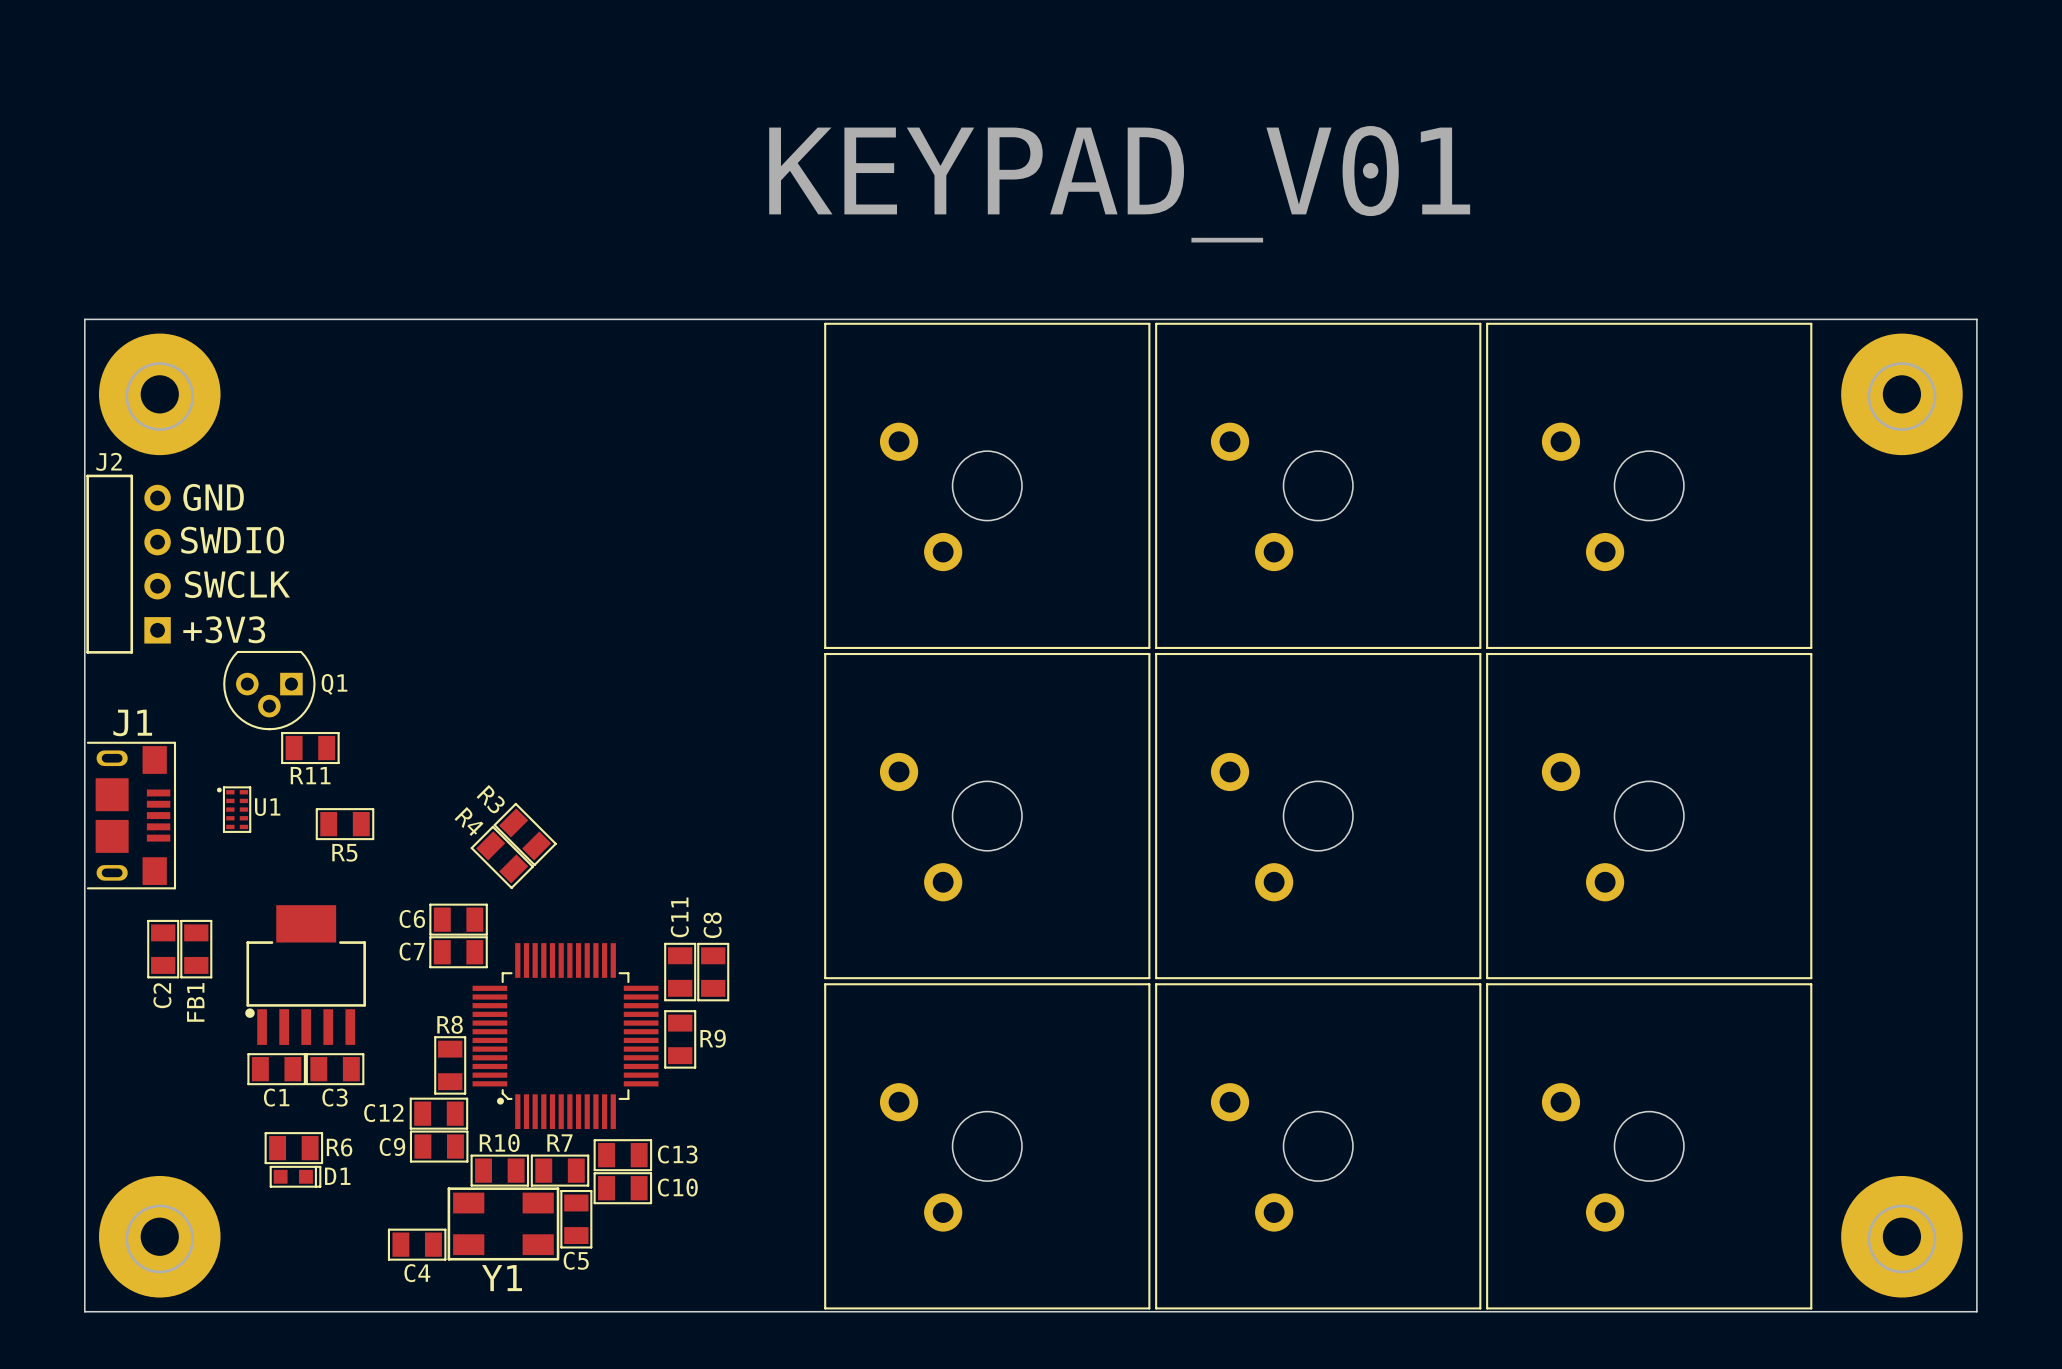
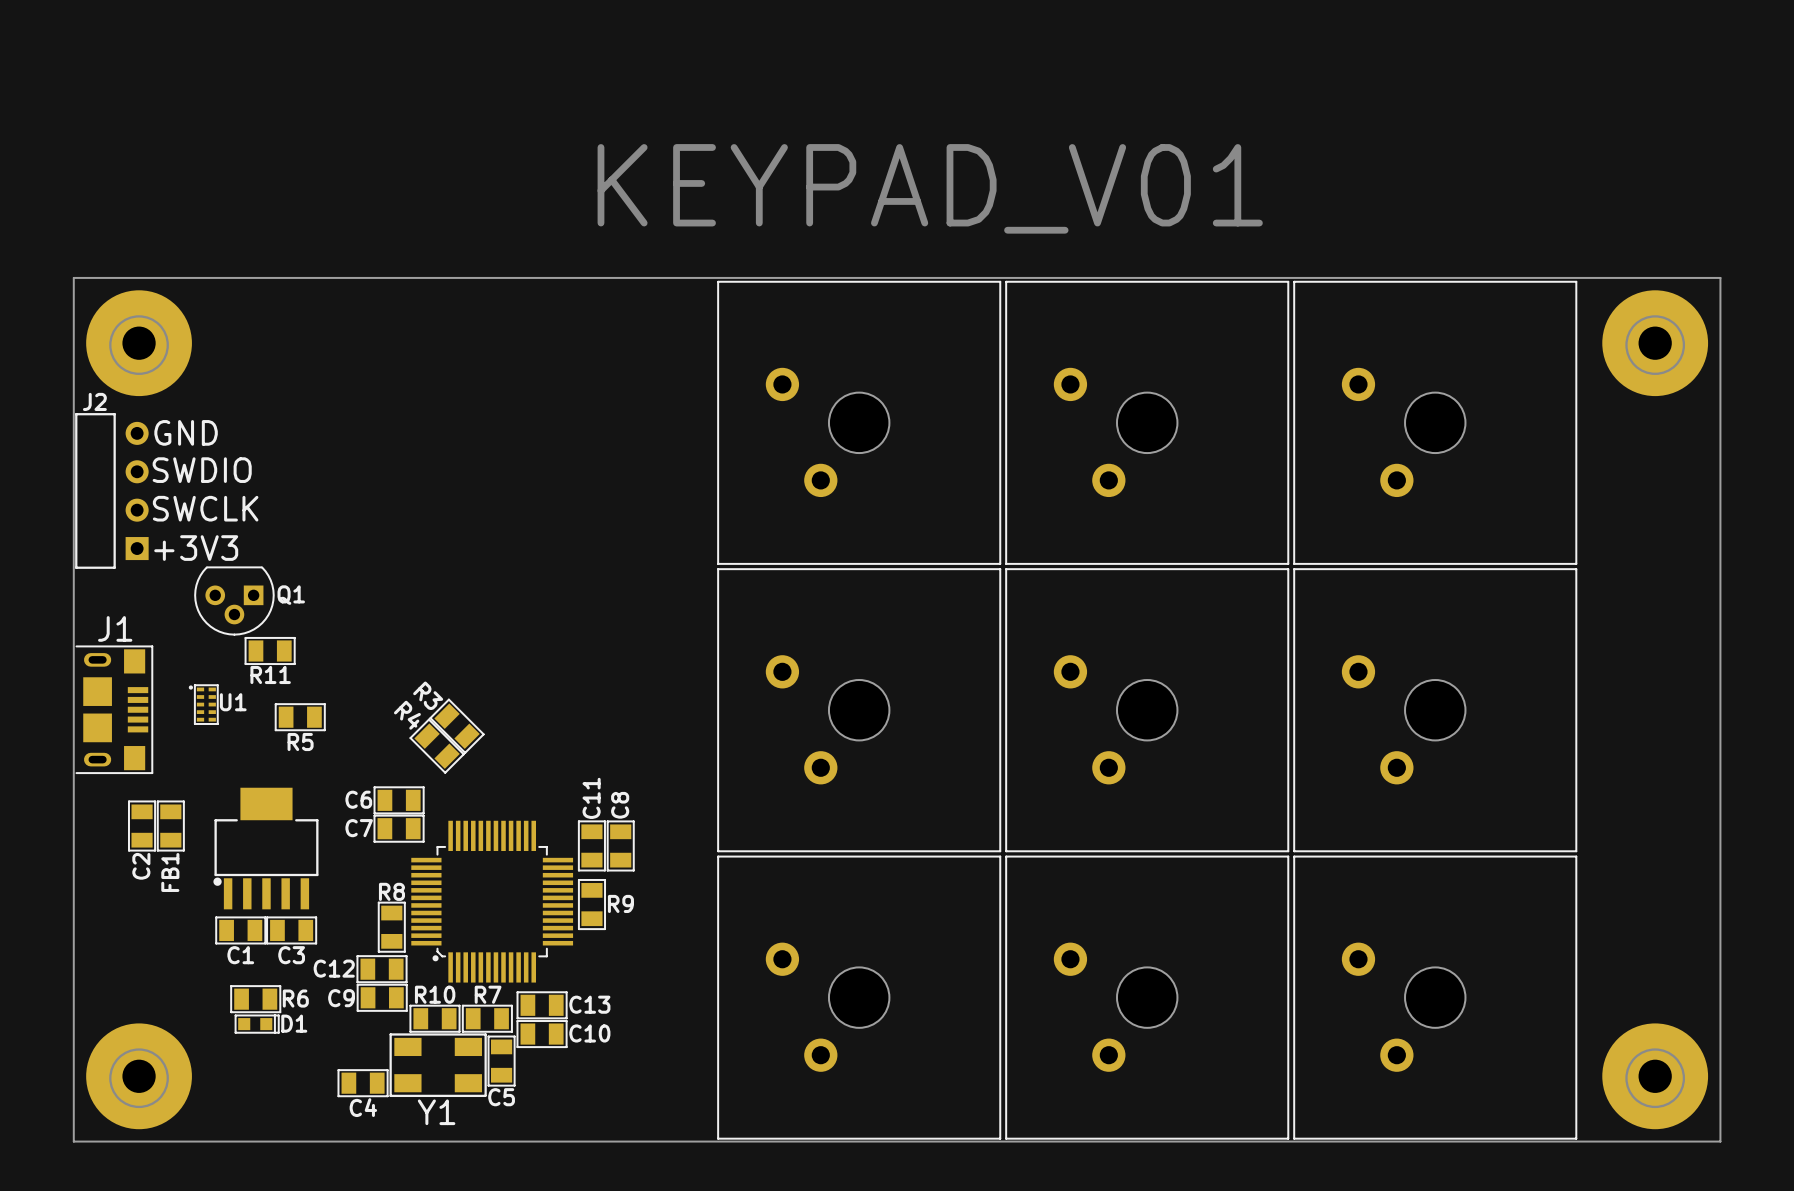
text position: KEYPAD_V01 (1119, 184) -> KEYPAD_V01 (930, 188)

